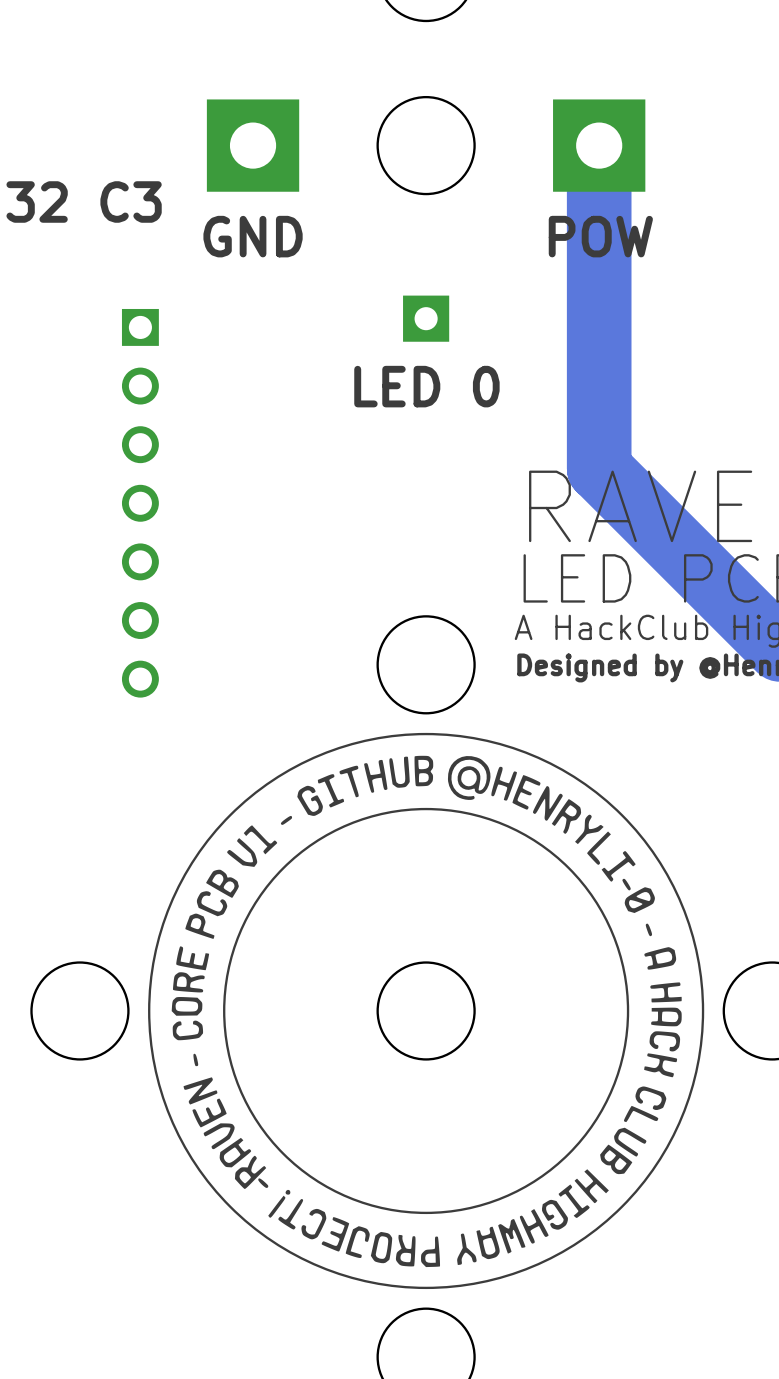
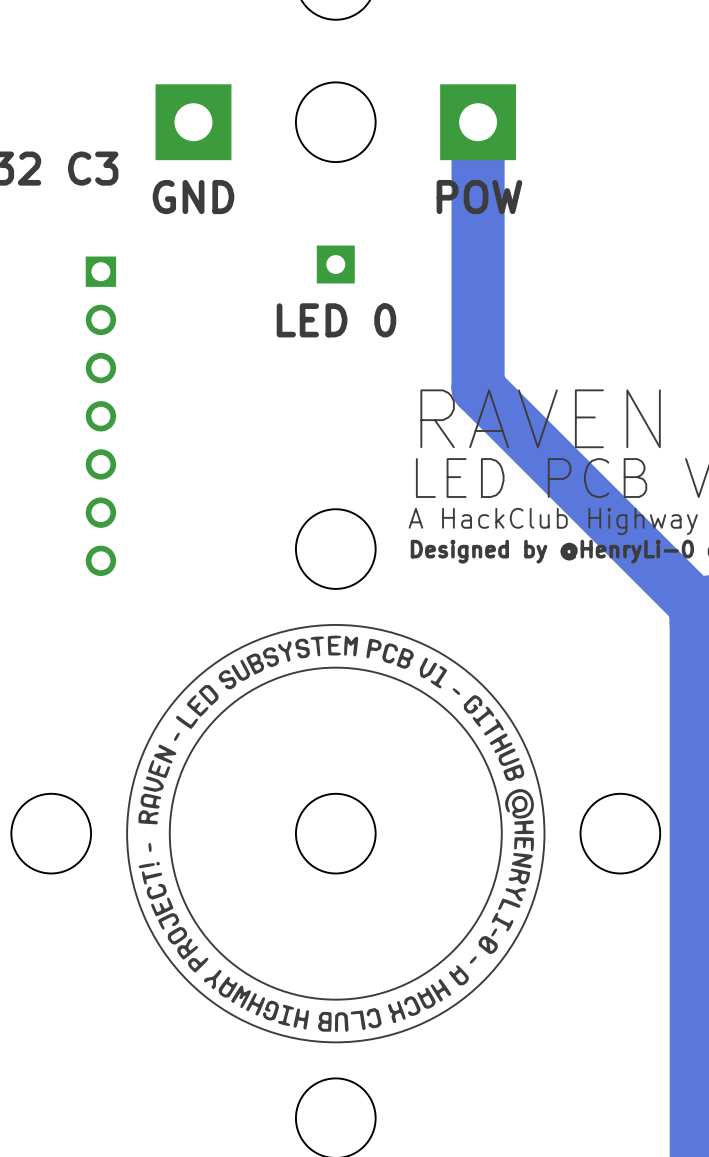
drawing: [148, 732, 705, 1290] -> none
drawing: none -> [126, 624, 546, 1044]

